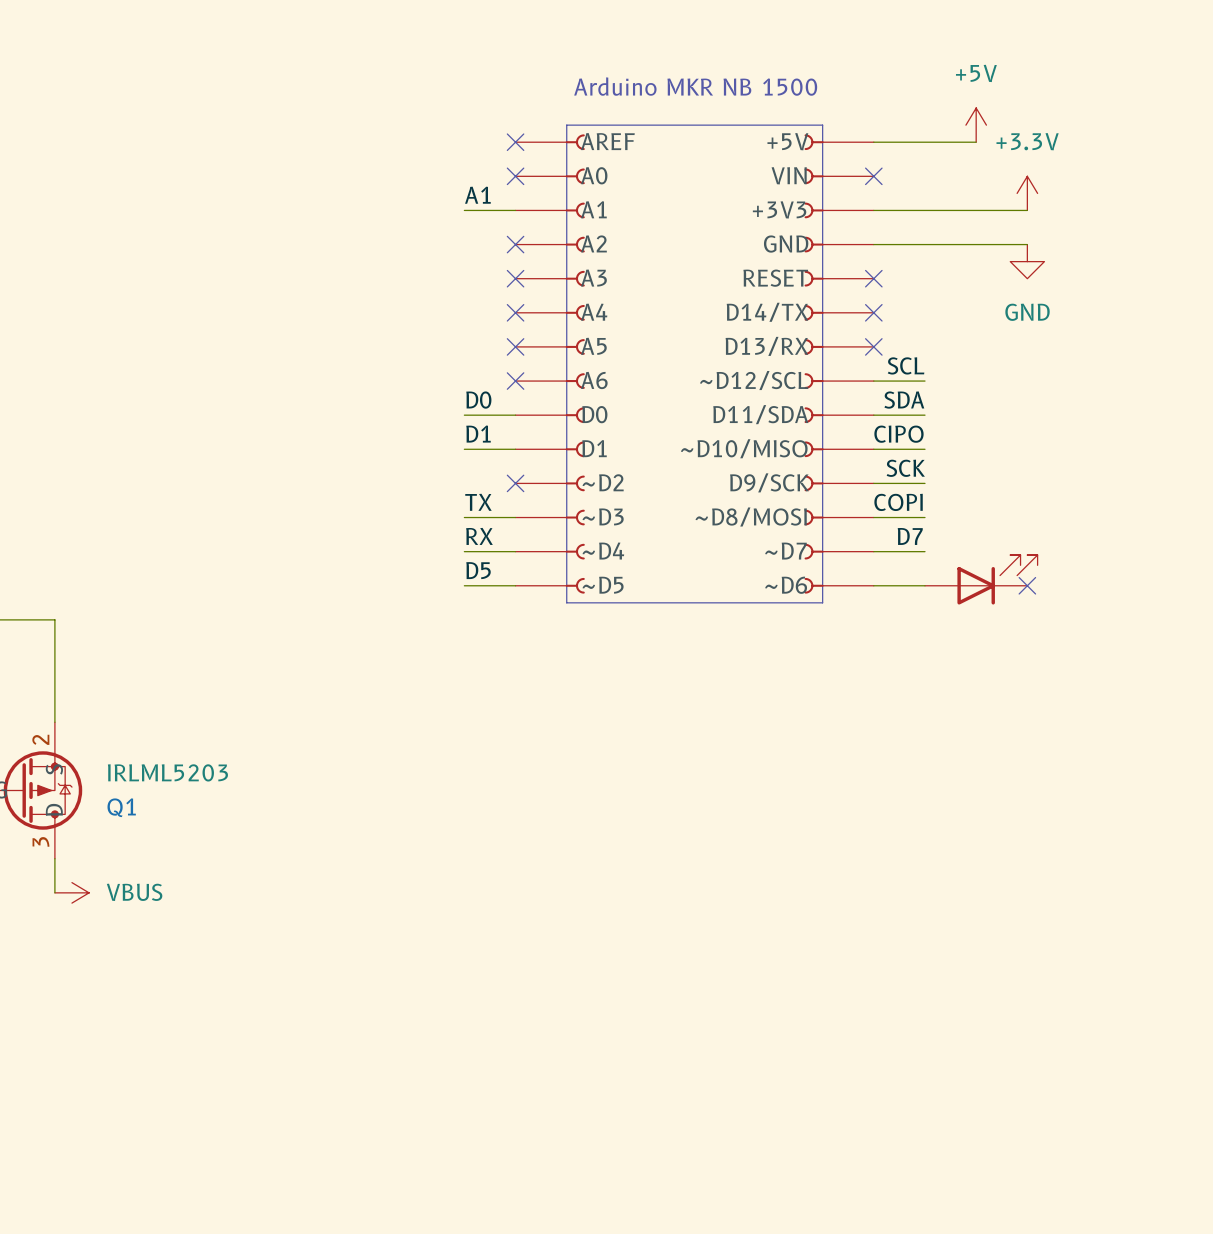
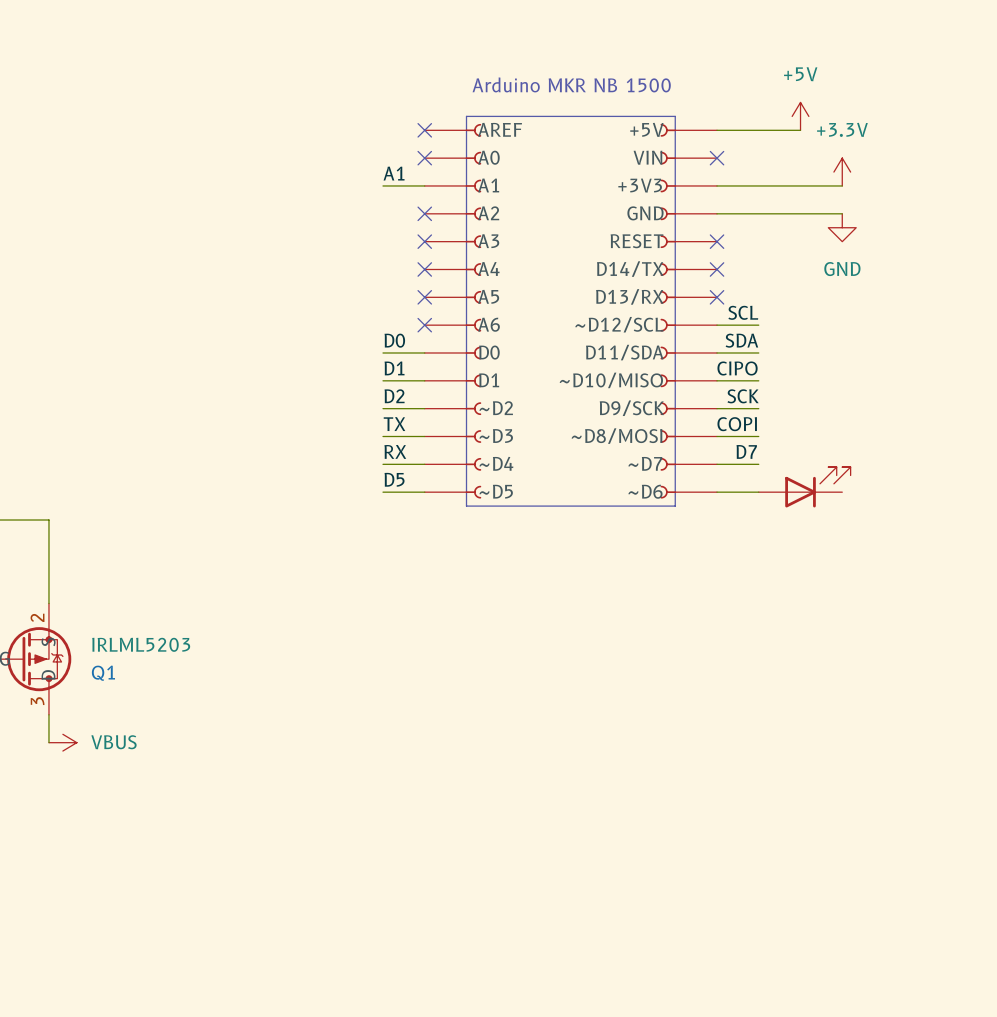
label: none -> D2 (394, 396)
wire: none -> (383, 408) (424, 408)
no-connect mark: (515, 483) -> none
no-connect mark: (1027, 585) -> none

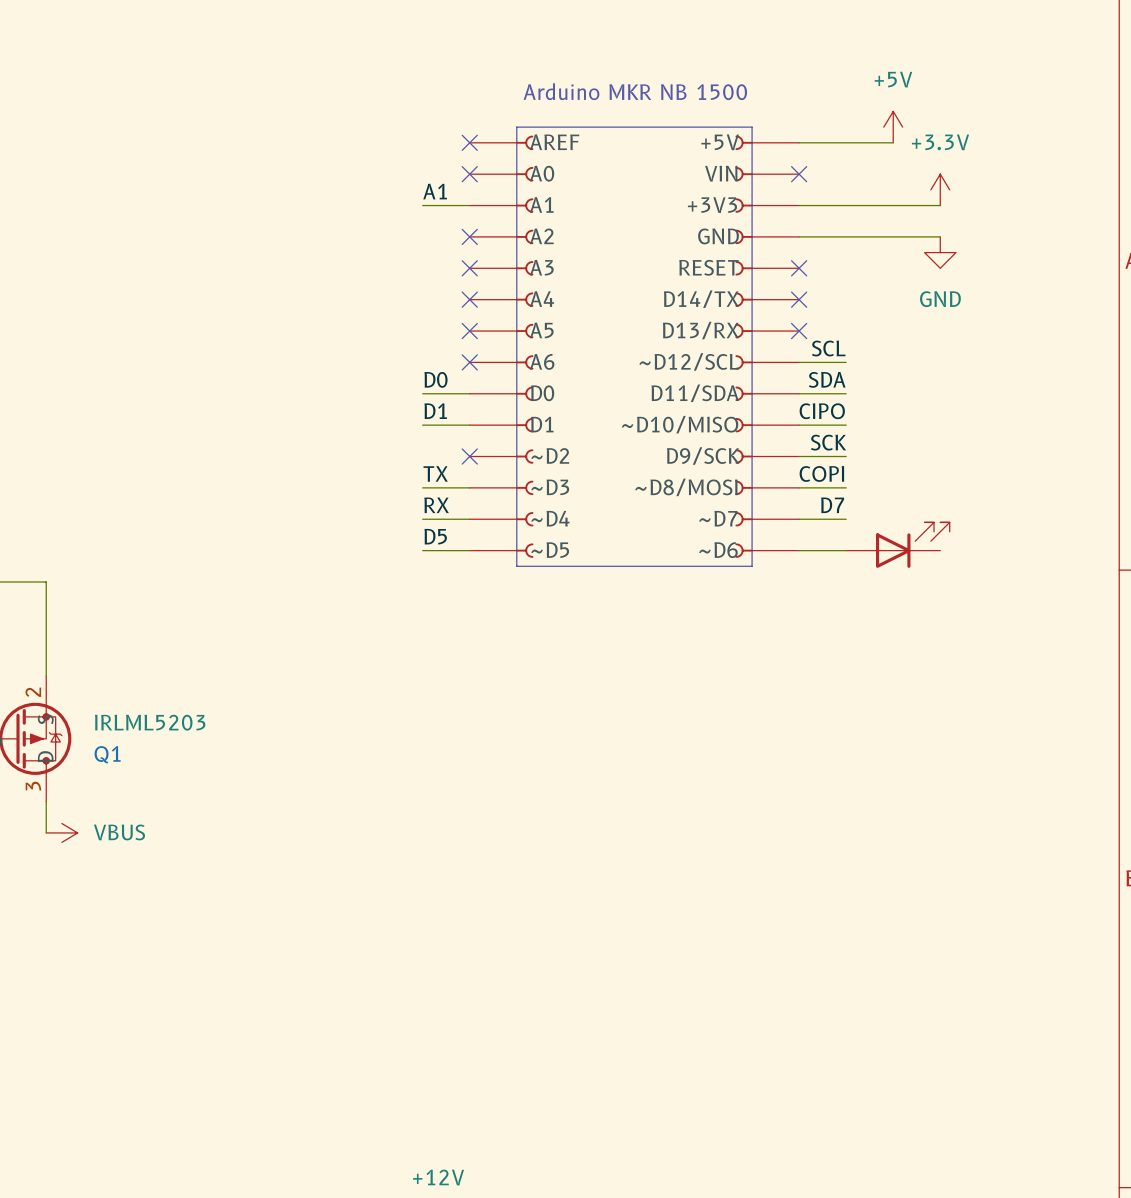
label: D2 (394, 396) -> none
wire: (383, 408) (424, 408) -> none
no-connect mark: none -> (469, 456)

